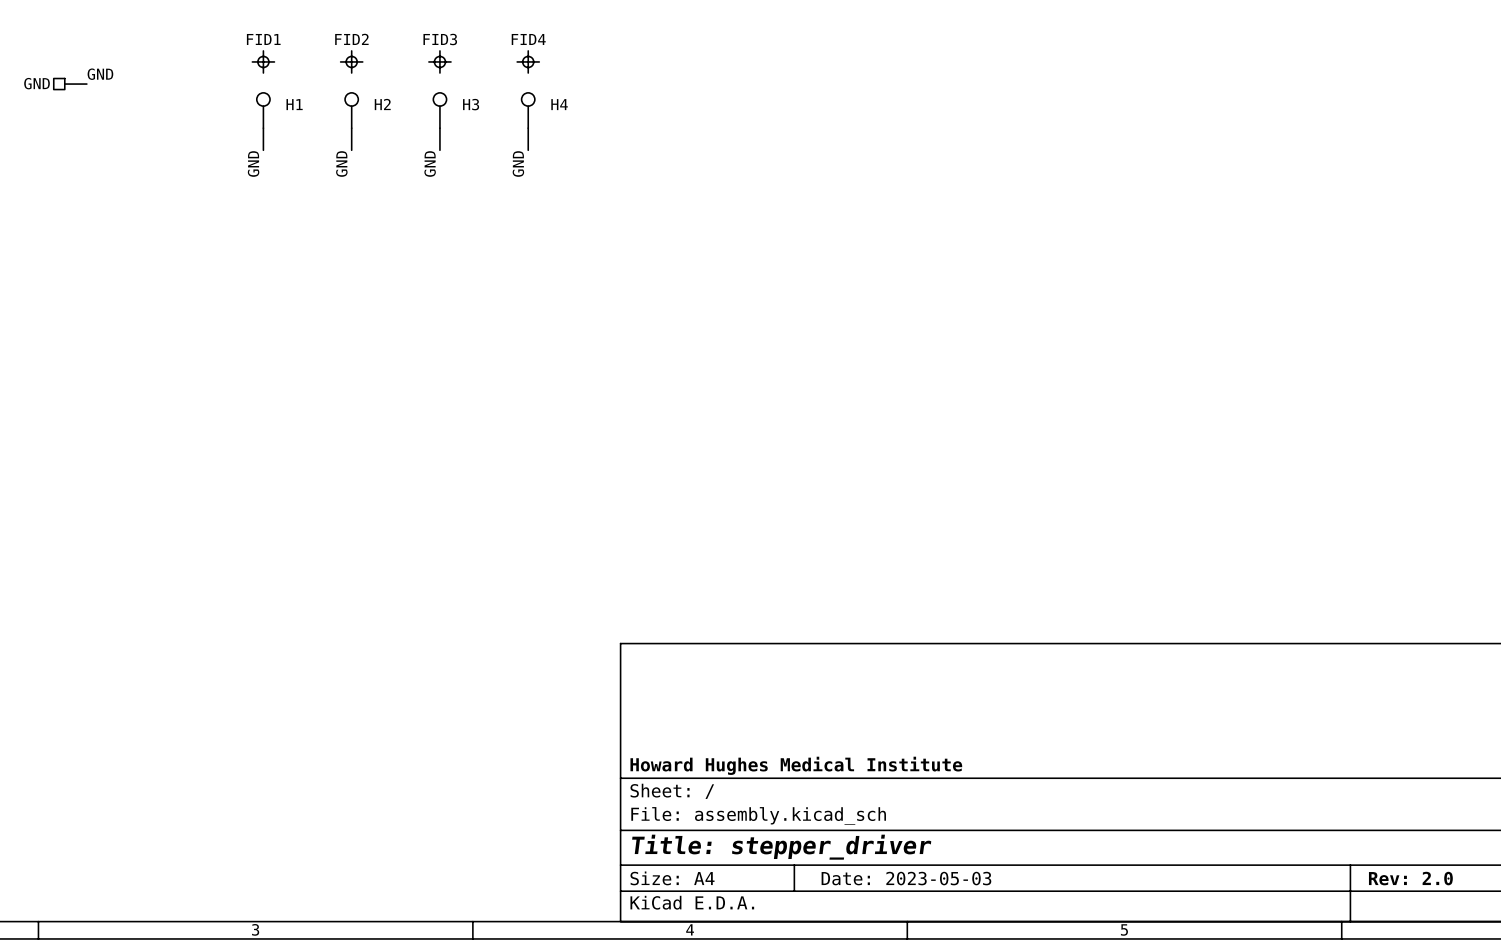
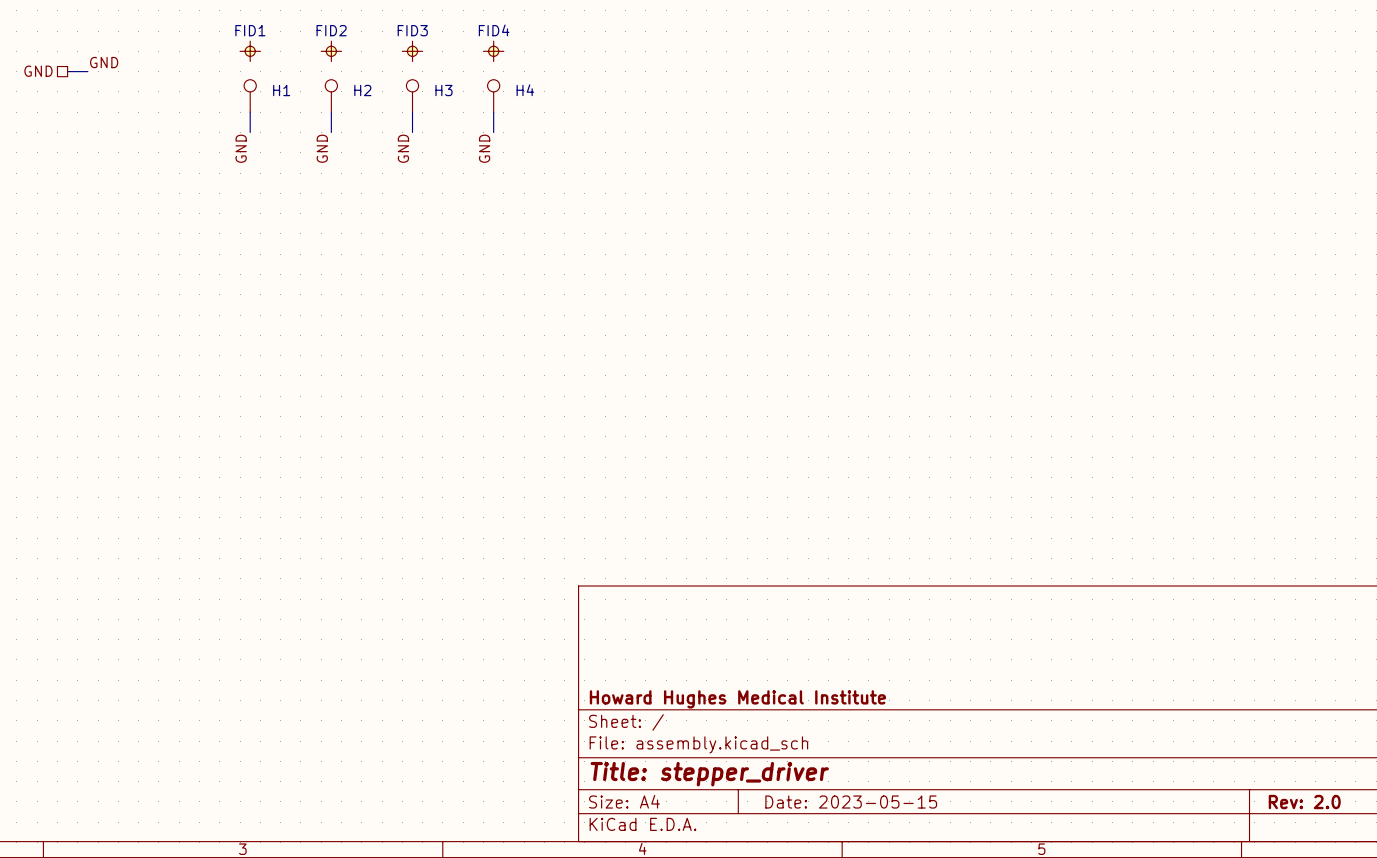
title block: Date: 2023-05-03 (906, 878) -> Date: 2023-05-15 (851, 802)

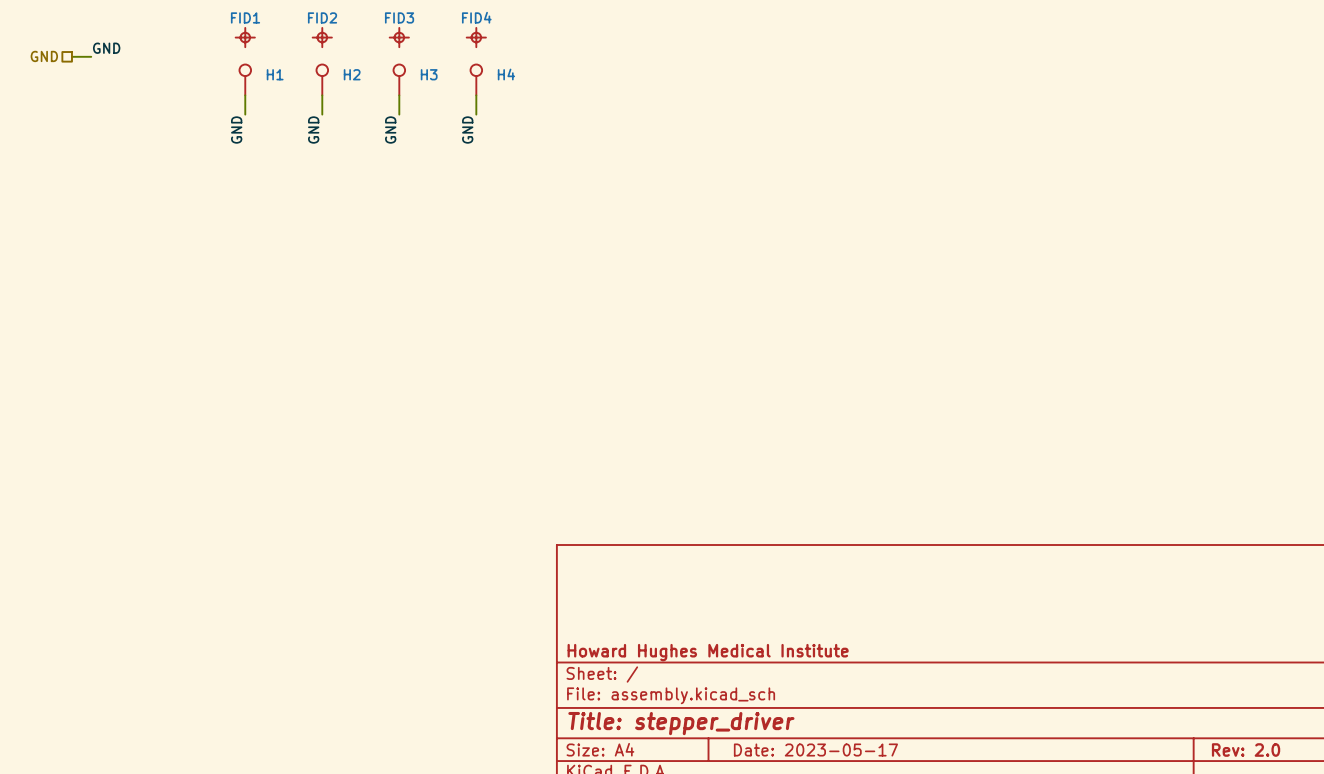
title block: Date: 2023-05-15 (851, 802) -> Date: 2023-05-17 (815, 750)

